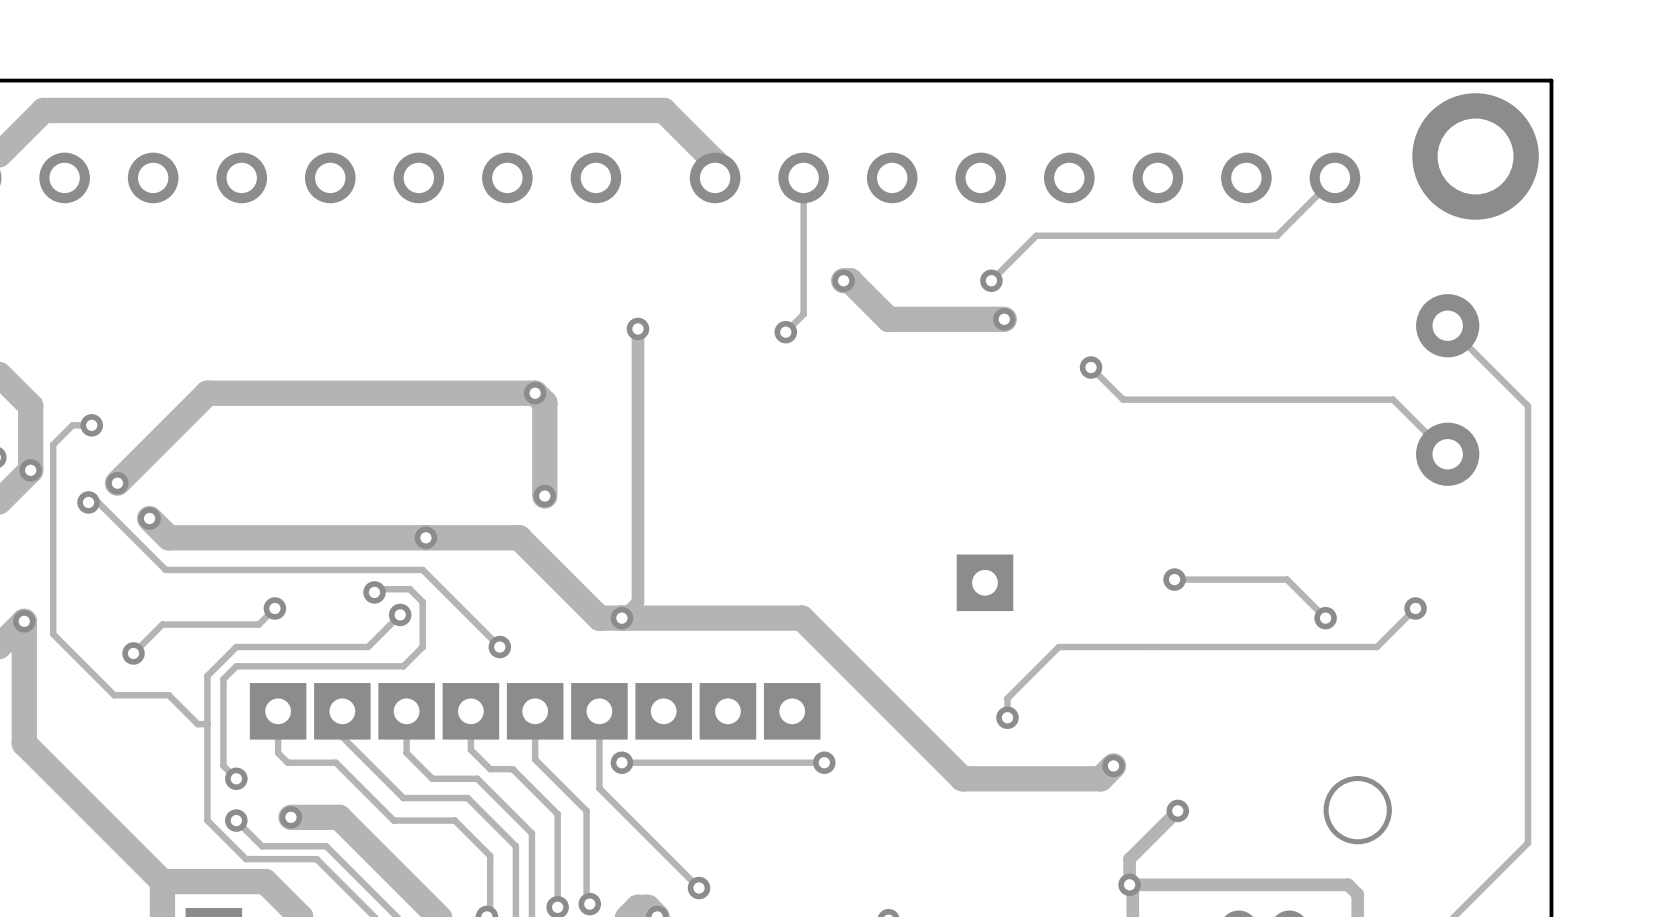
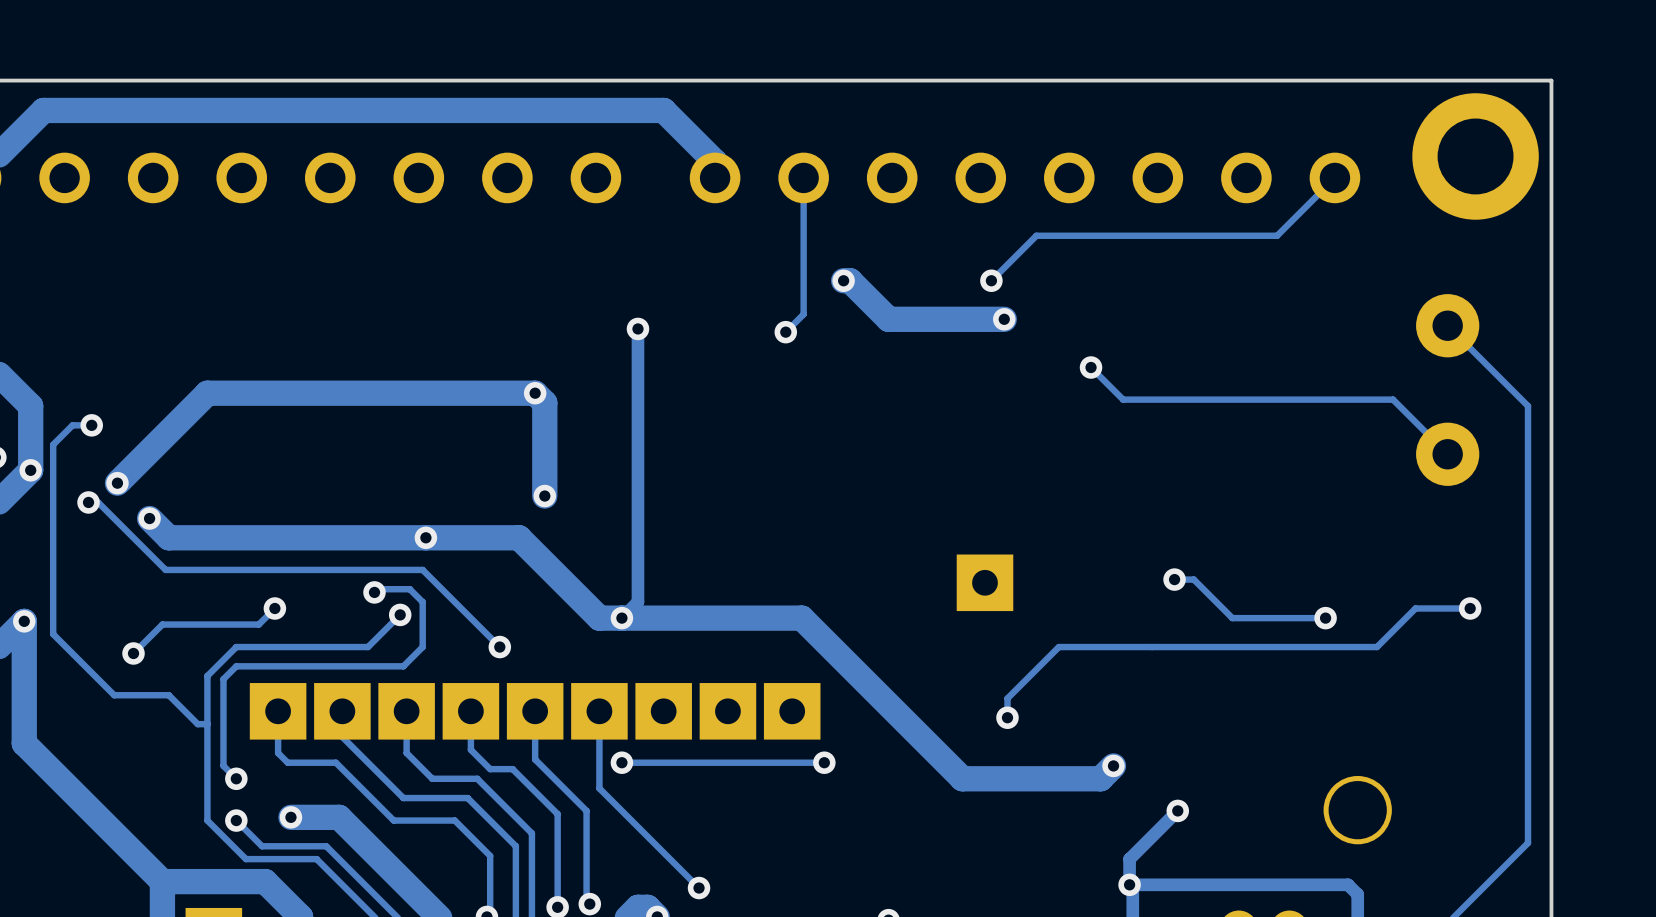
track: (1193, 579) (1287, 579) (1325, 618) -> (1193, 579) (1232, 618) (1325, 618)
via position: (1415, 608) -> (1470, 608)
track: none -> (1470, 608) (1415, 608)

